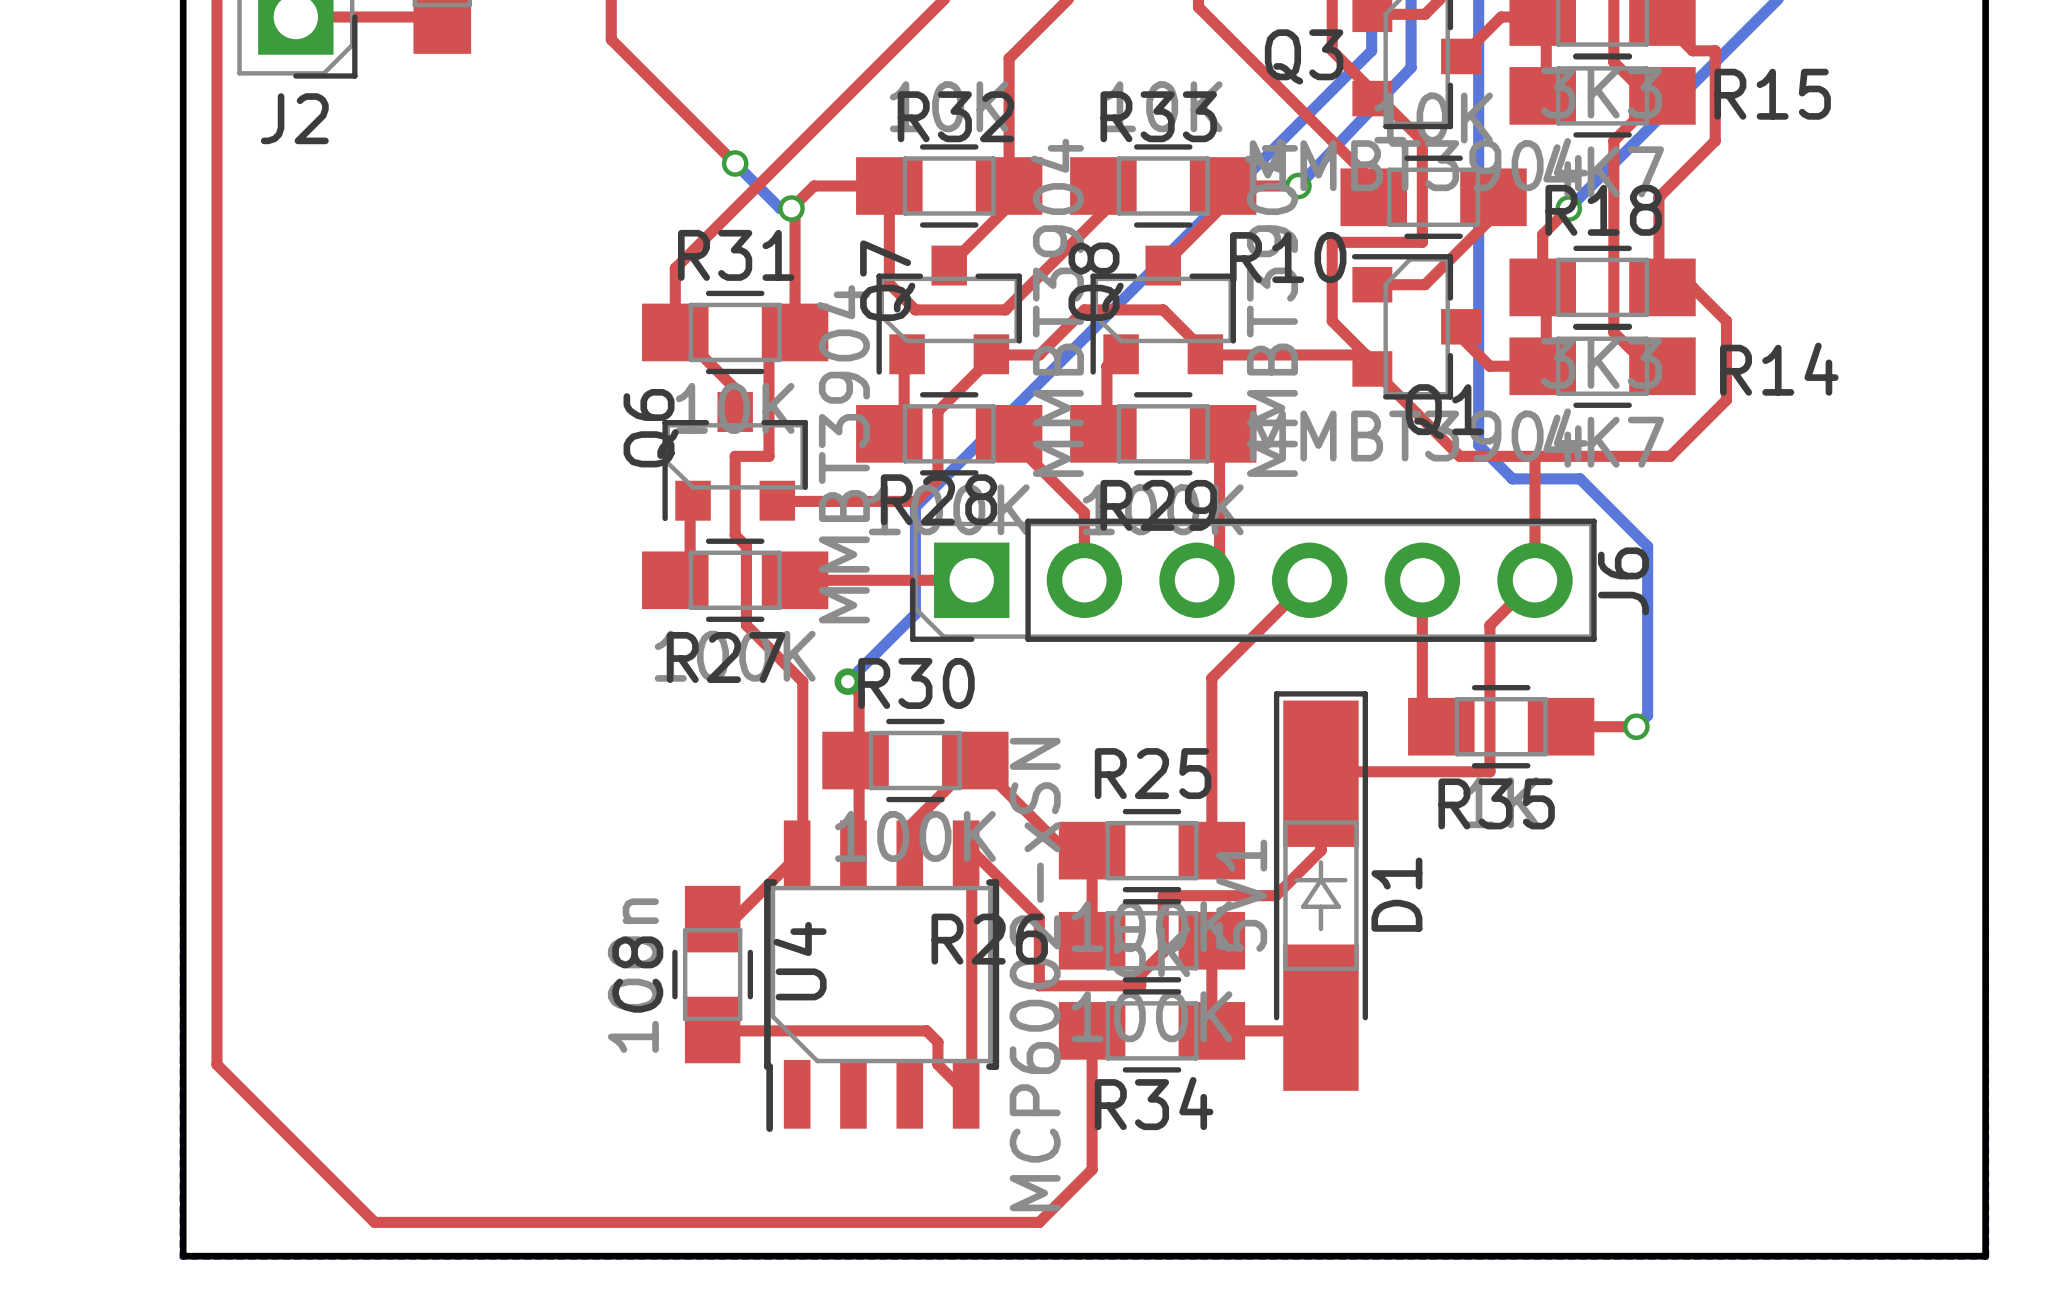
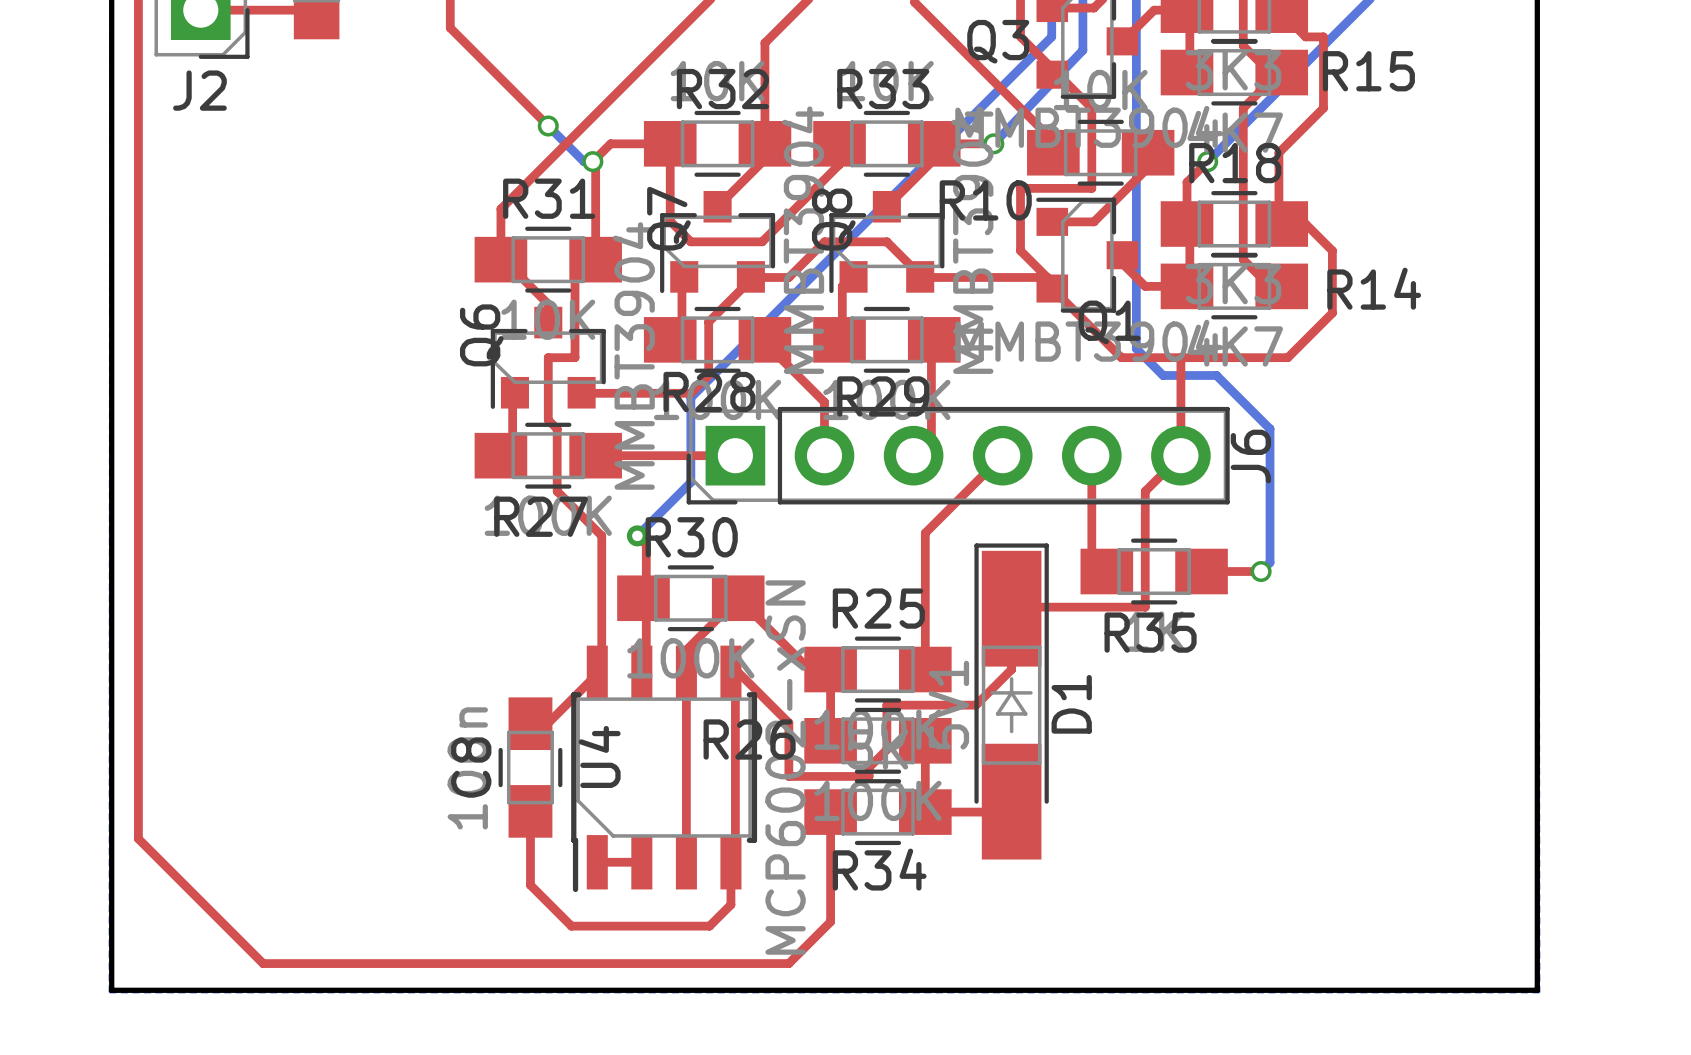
top track: none -> (686, 672) (686, 862)
top track: (712, 1030) (926, 1030) (937, 1042) (937, 1064) (971, 1098) -> (530, 812) (530, 885) (571, 926) (709, 926) (730, 904) (730, 862)
top track: none -> (597, 862) (641, 862)

